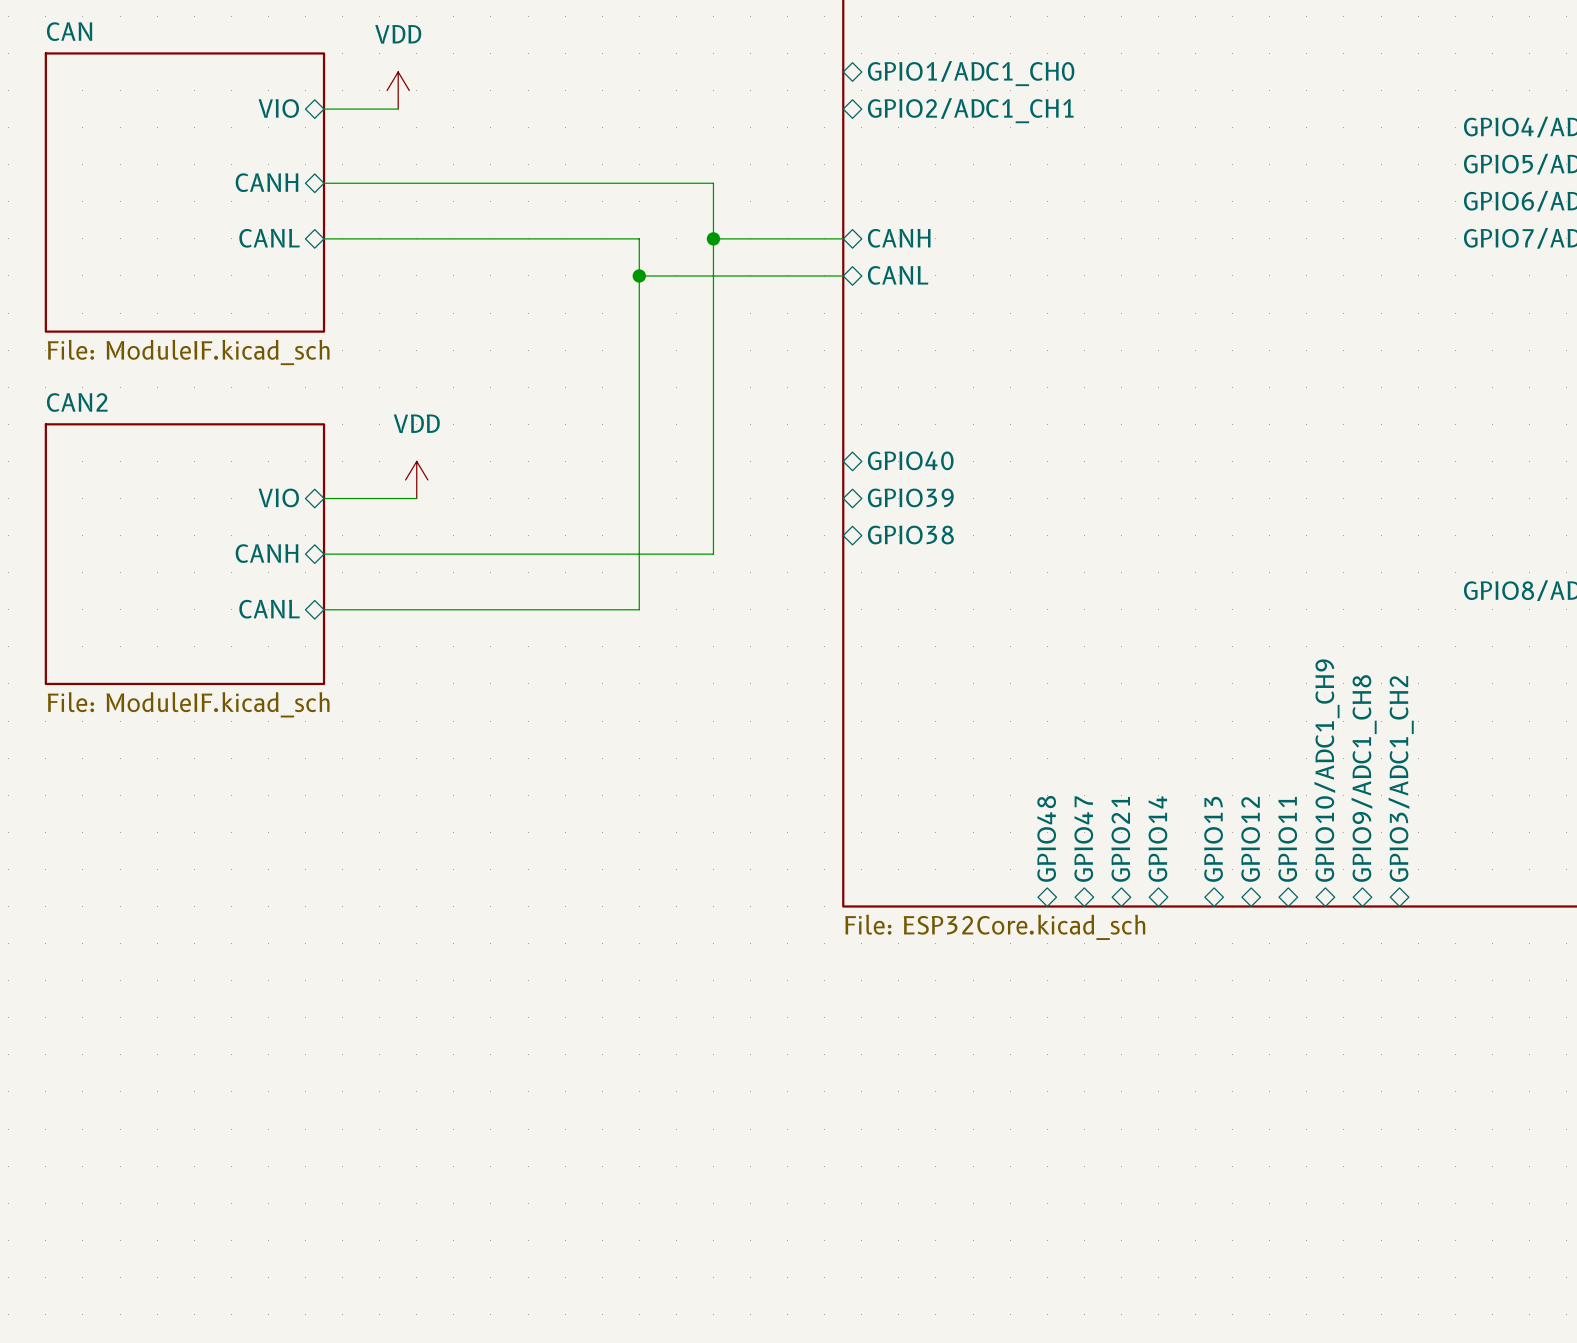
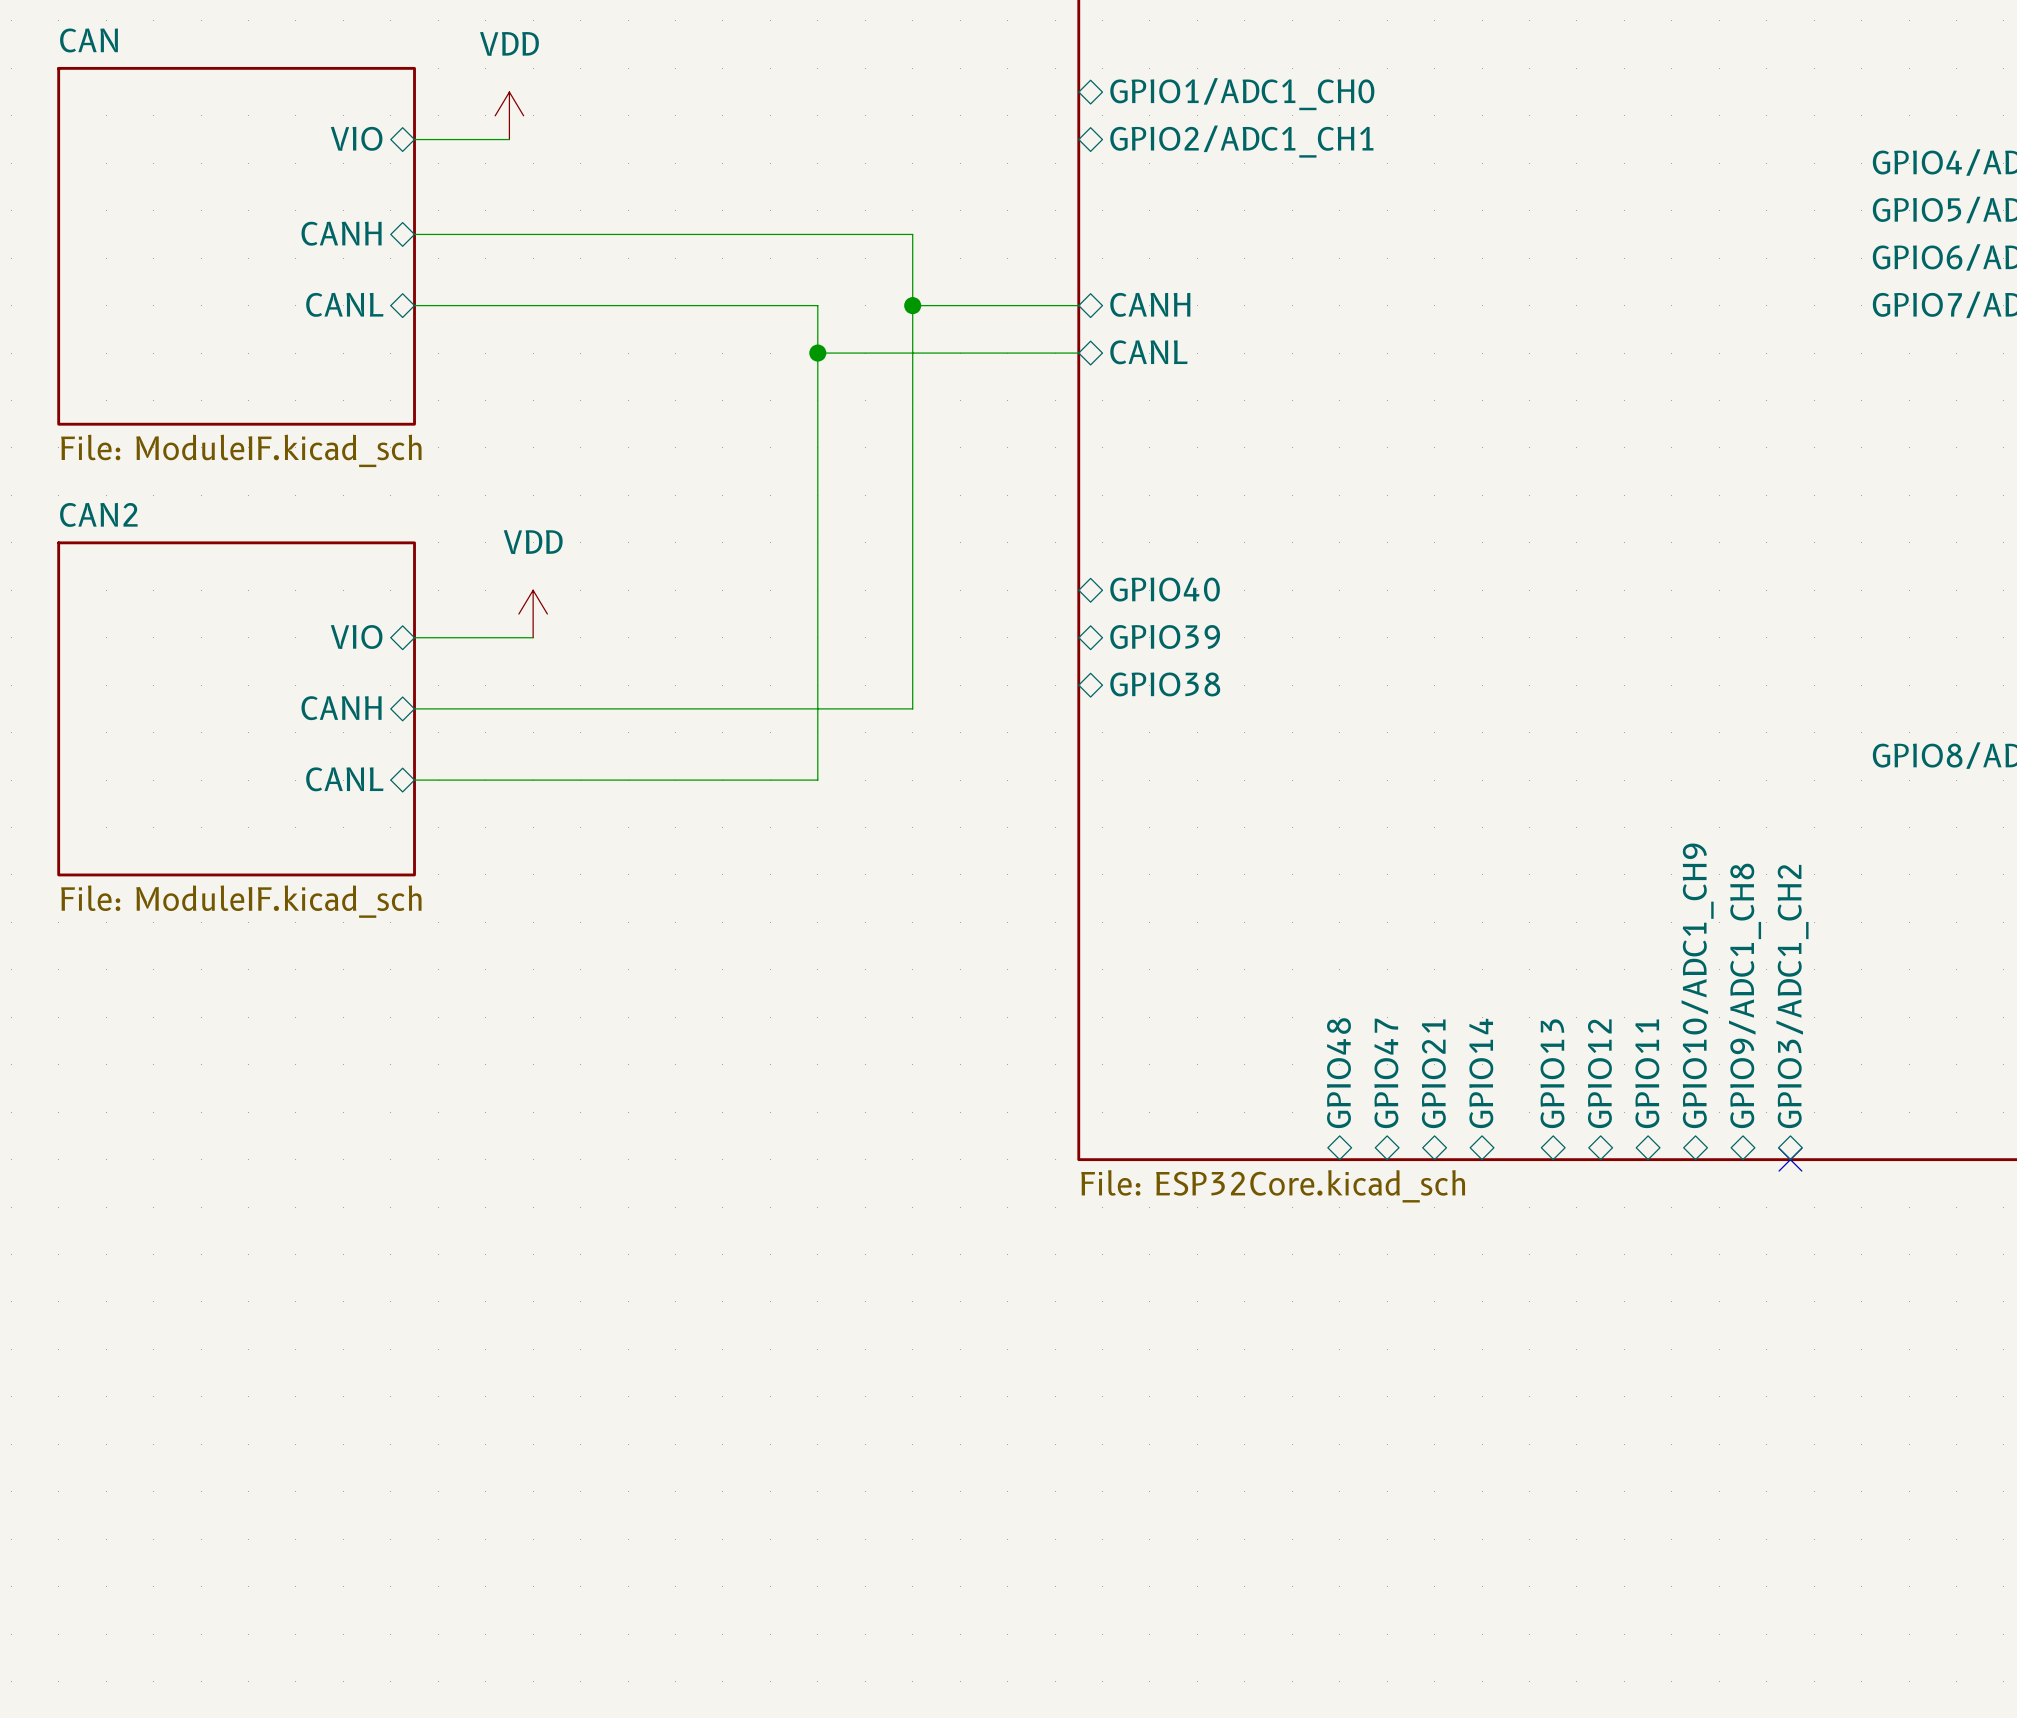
no-connect mark: none -> (1790, 1159)

